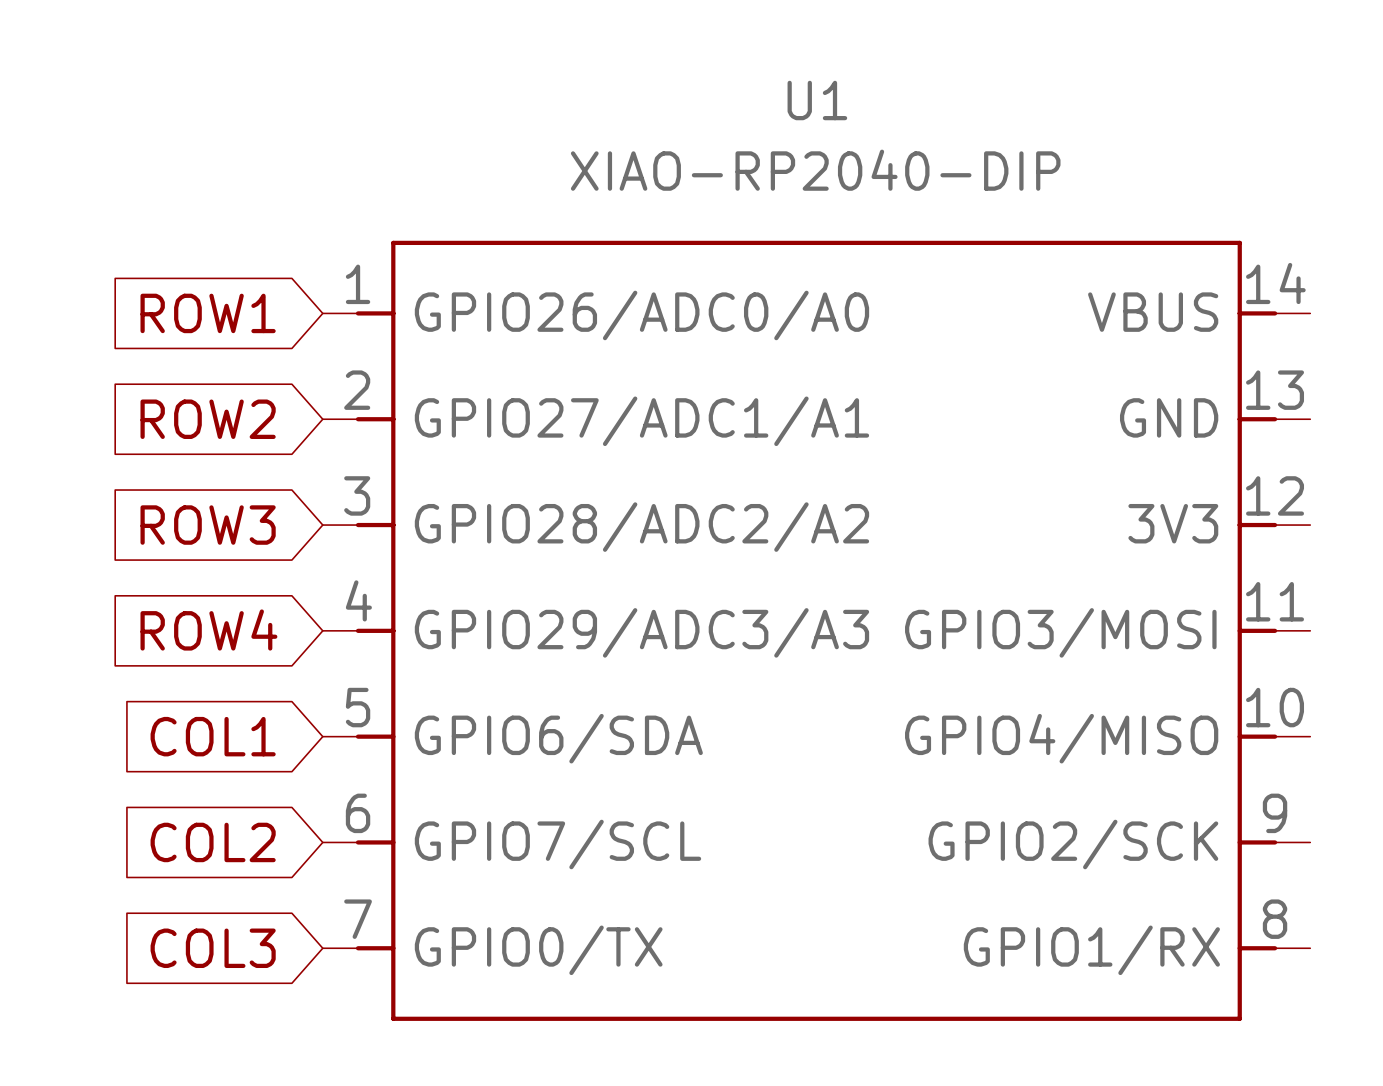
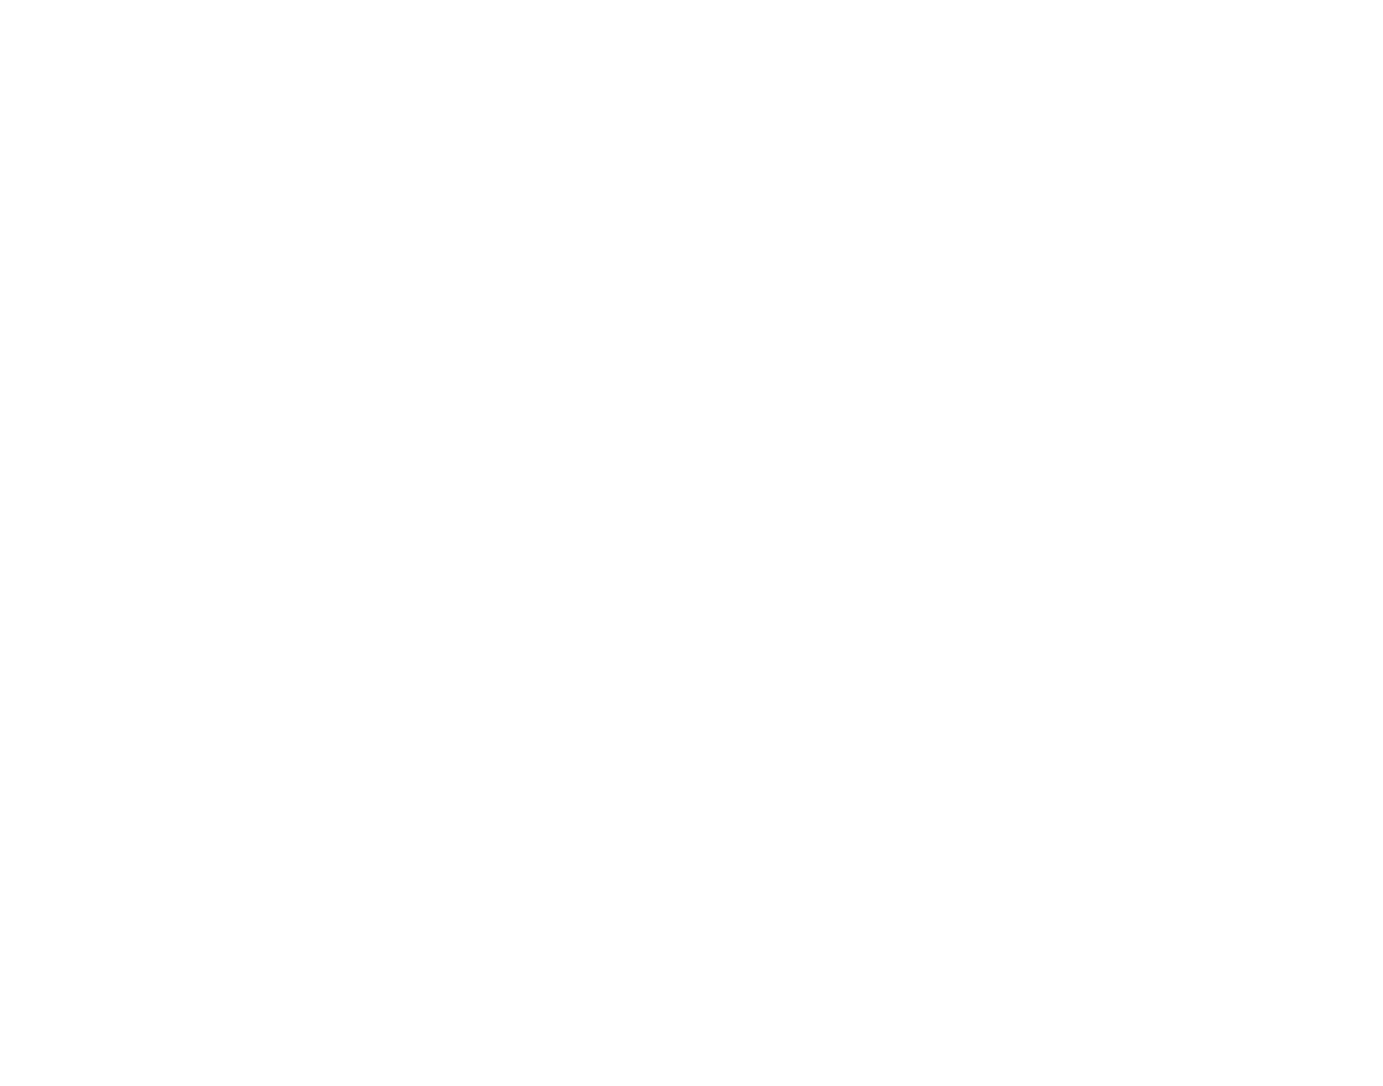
global label: ROW1 (208, 313) -> none
global label: ROW2 (208, 419) -> none
global label: ROW3 (208, 525) -> none
global label: ROW4 (208, 630) -> none
U1: XIAO-RP2040-DIP (816, 630) -> none
global label: COL1 (213, 736) -> none
global label: COL2 (213, 842) -> none
global label: COL3 (213, 948) -> none

